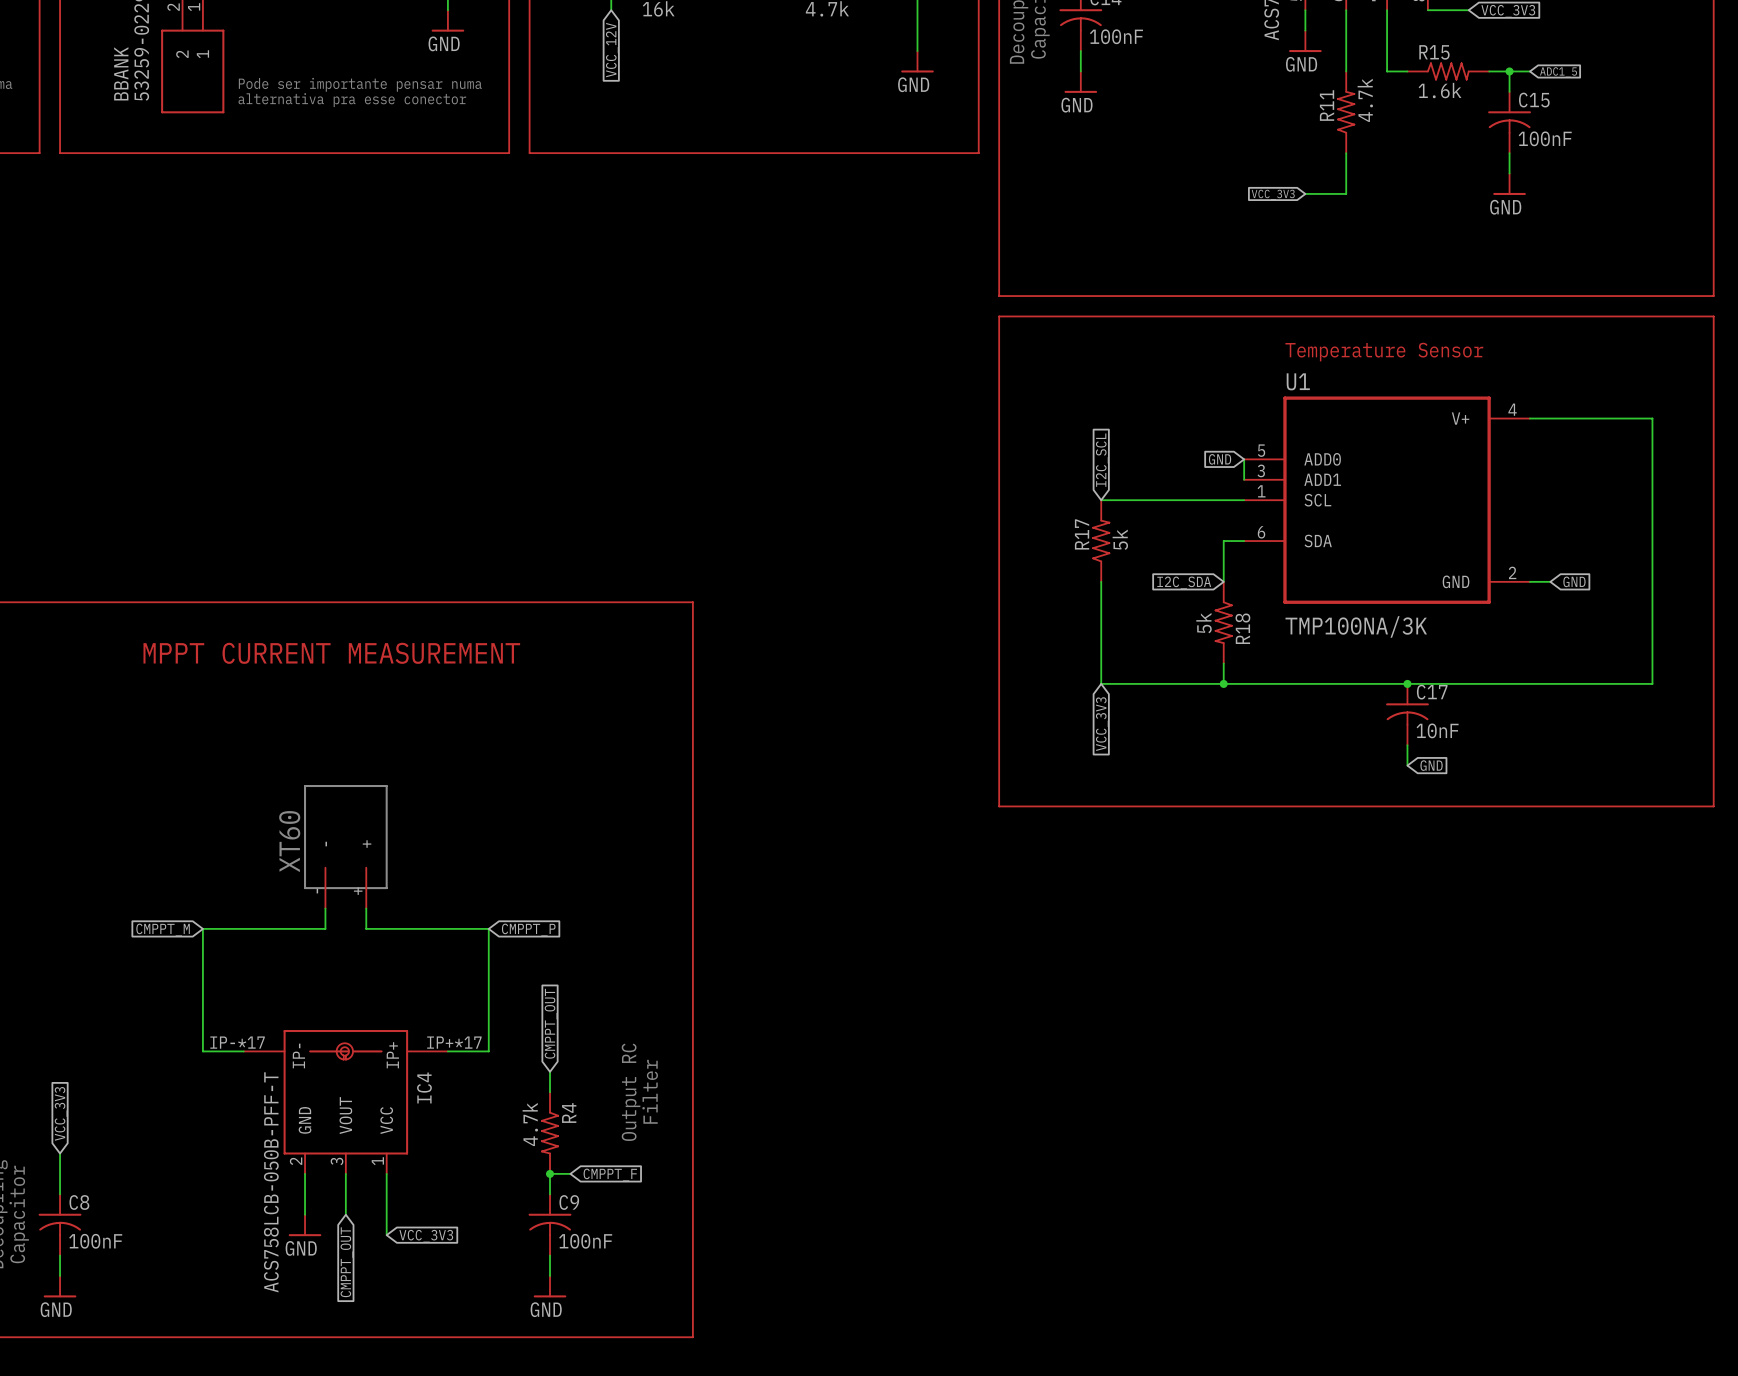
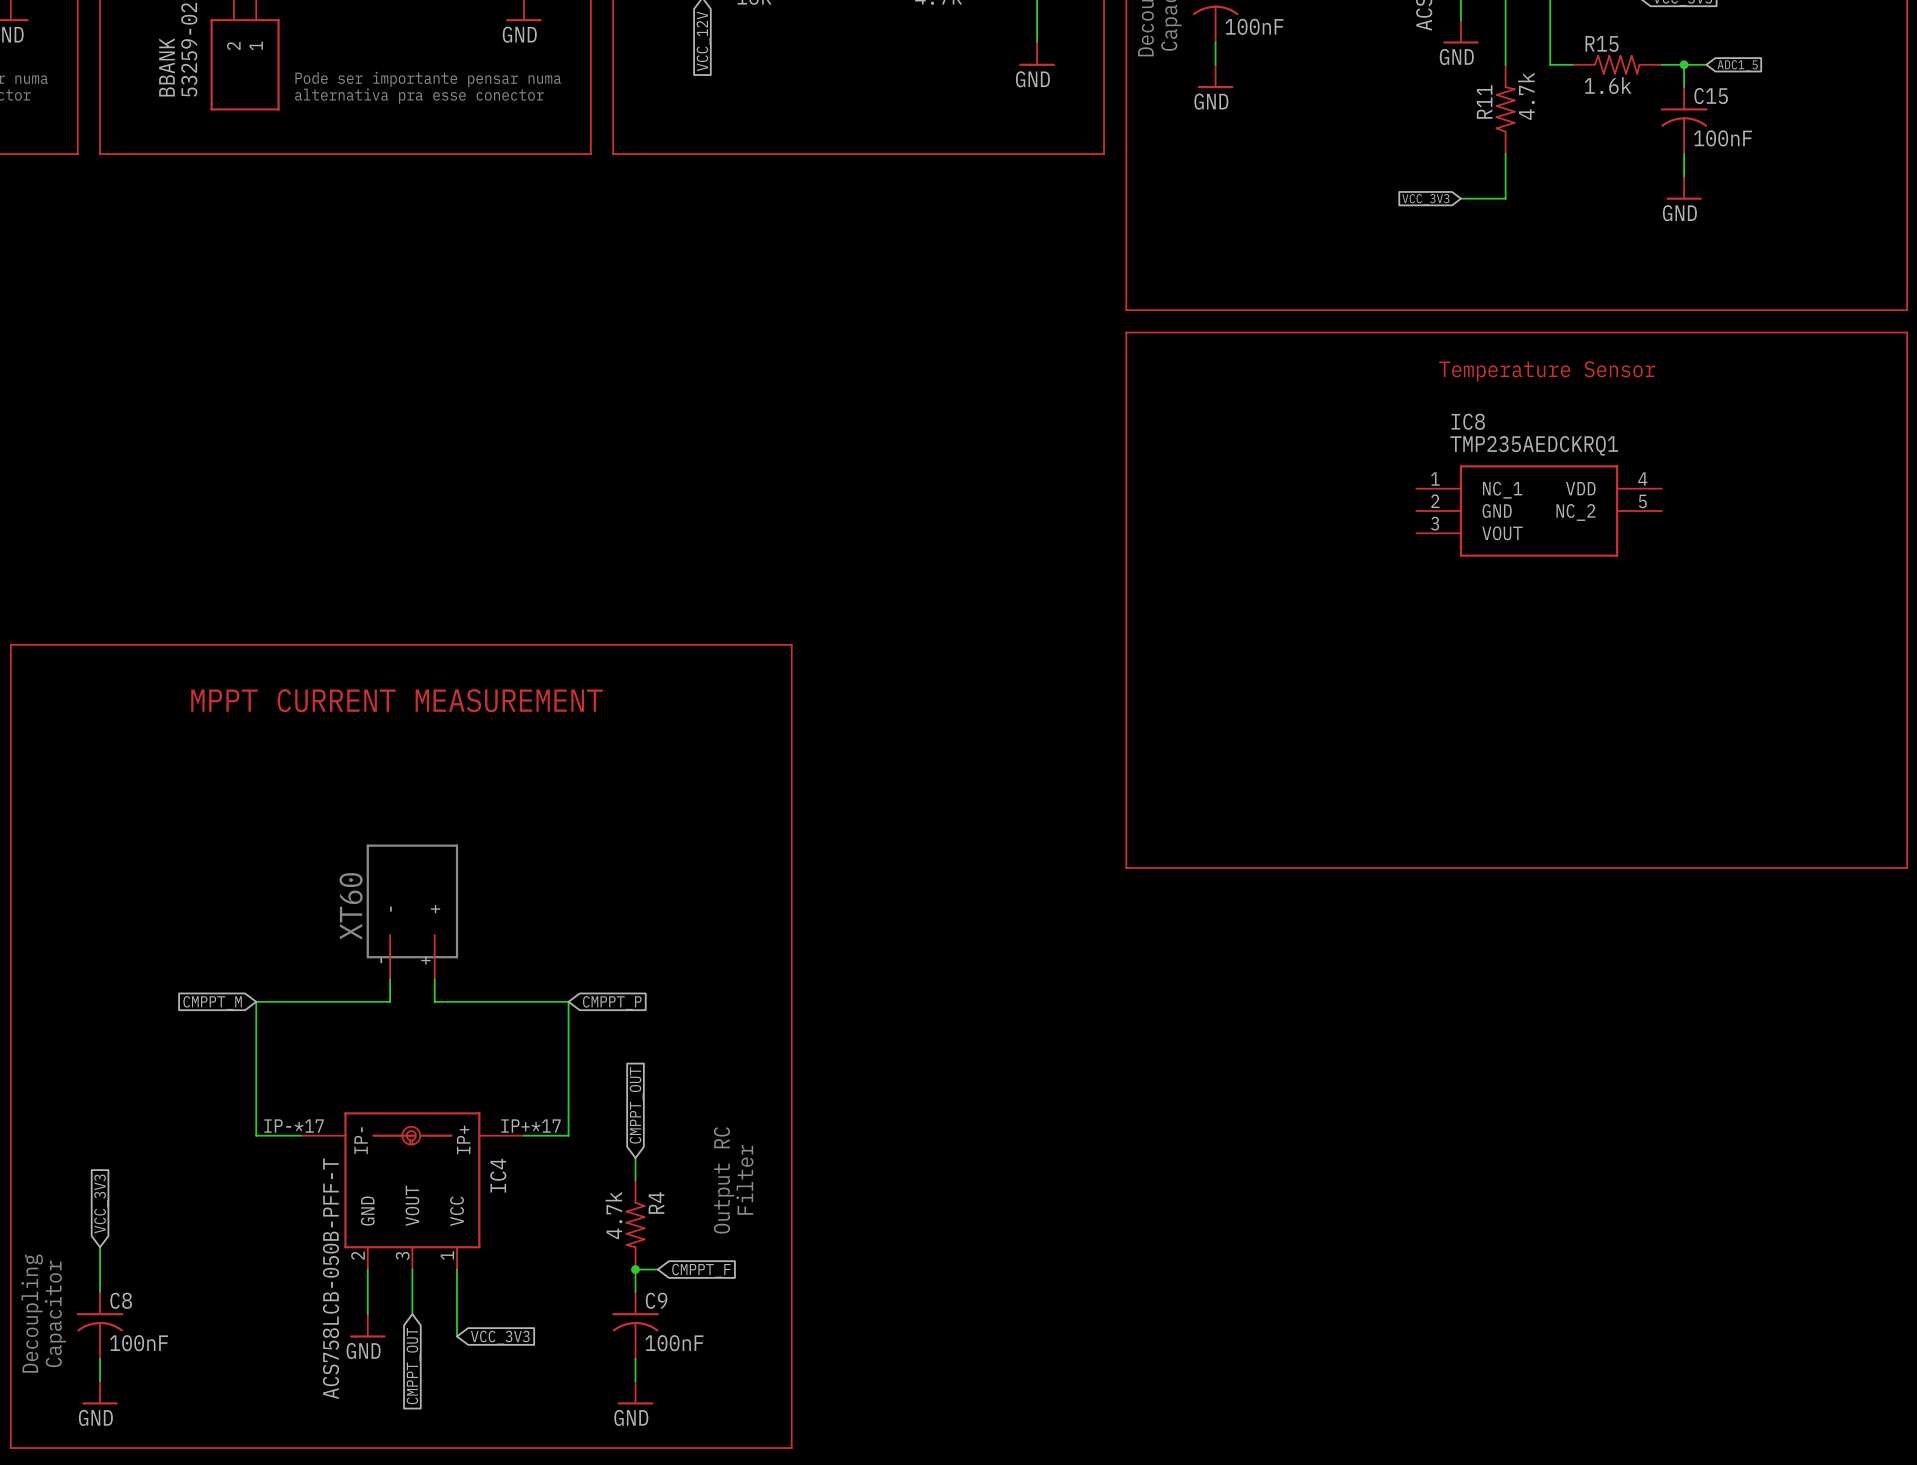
wire: (1529, 418) (1652, 418) (1652, 683) (1101, 683) (1101, 581) -> none
global label: GND (1220, 459) -> none
wire: (1244, 459) (1244, 479) -> none
global label: I2C_SCL (1102, 460) -> none
IC8: none -> TMP235AEDCKRQ1 (1539, 511)
wire: (1101, 500) (1244, 500) -> none
U1: TMP100NA/3K (1387, 500) -> none
R17: 5k (1101, 541) -> none
wire: (1244, 541) (1223, 541) (1223, 581) -> none
wire: (1529, 581) (1550, 581) -> none
global label: GND (1574, 581) -> none
global label: I2C_SDA (1184, 583) -> none
R18: 5k (1223, 622) -> none
wire: (1223, 663) (1223, 683) -> none
junction: (1223, 683) -> none
junction: (1407, 683) -> none
C17: 10nF (1407, 714) -> none
global label: VCC_3V3 (1102, 724) -> none
wire: (1407, 745) (1407, 765) -> none
global label: GND (1431, 765) -> none

